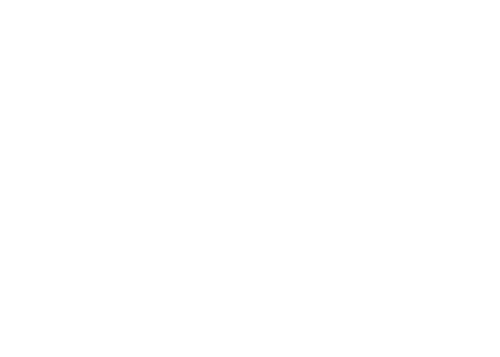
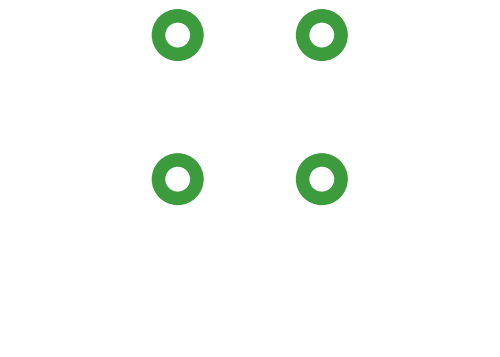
part: none -> (249, 107)

